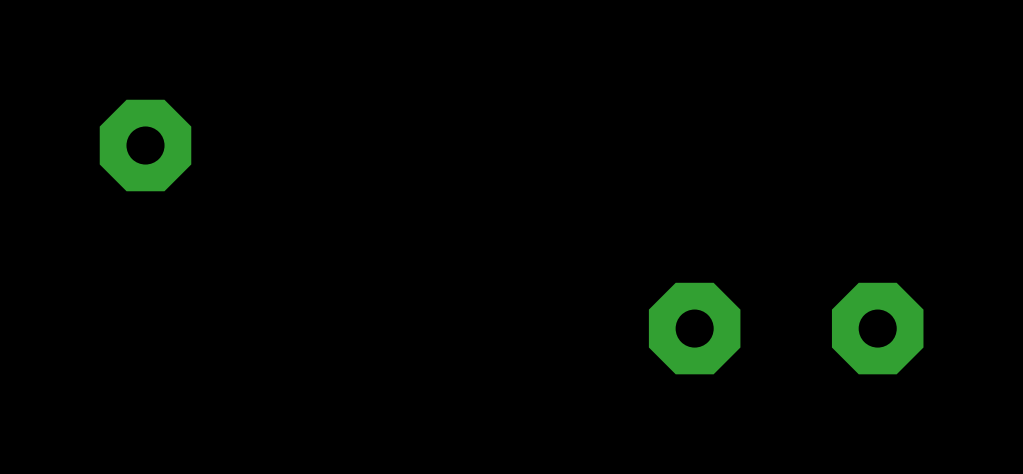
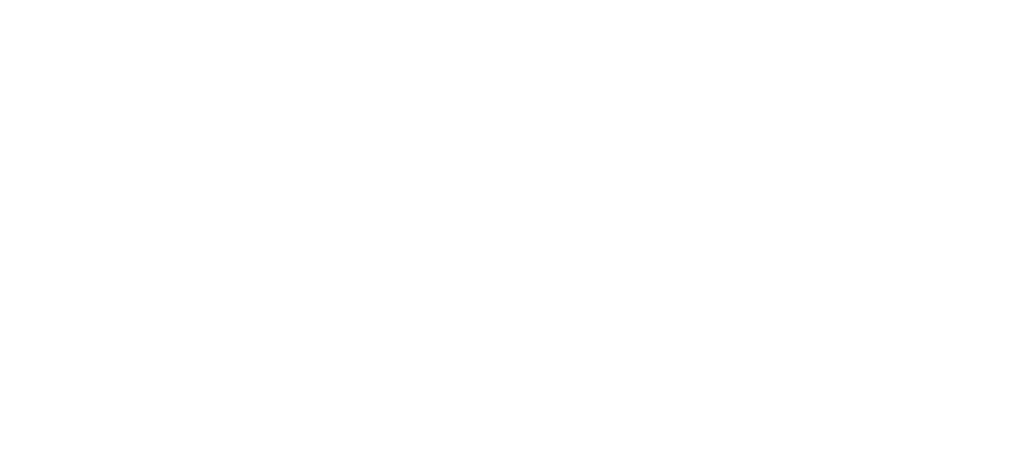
part: (145, 145) -> none
part: (694, 328) -> none
part: (877, 328) -> none

